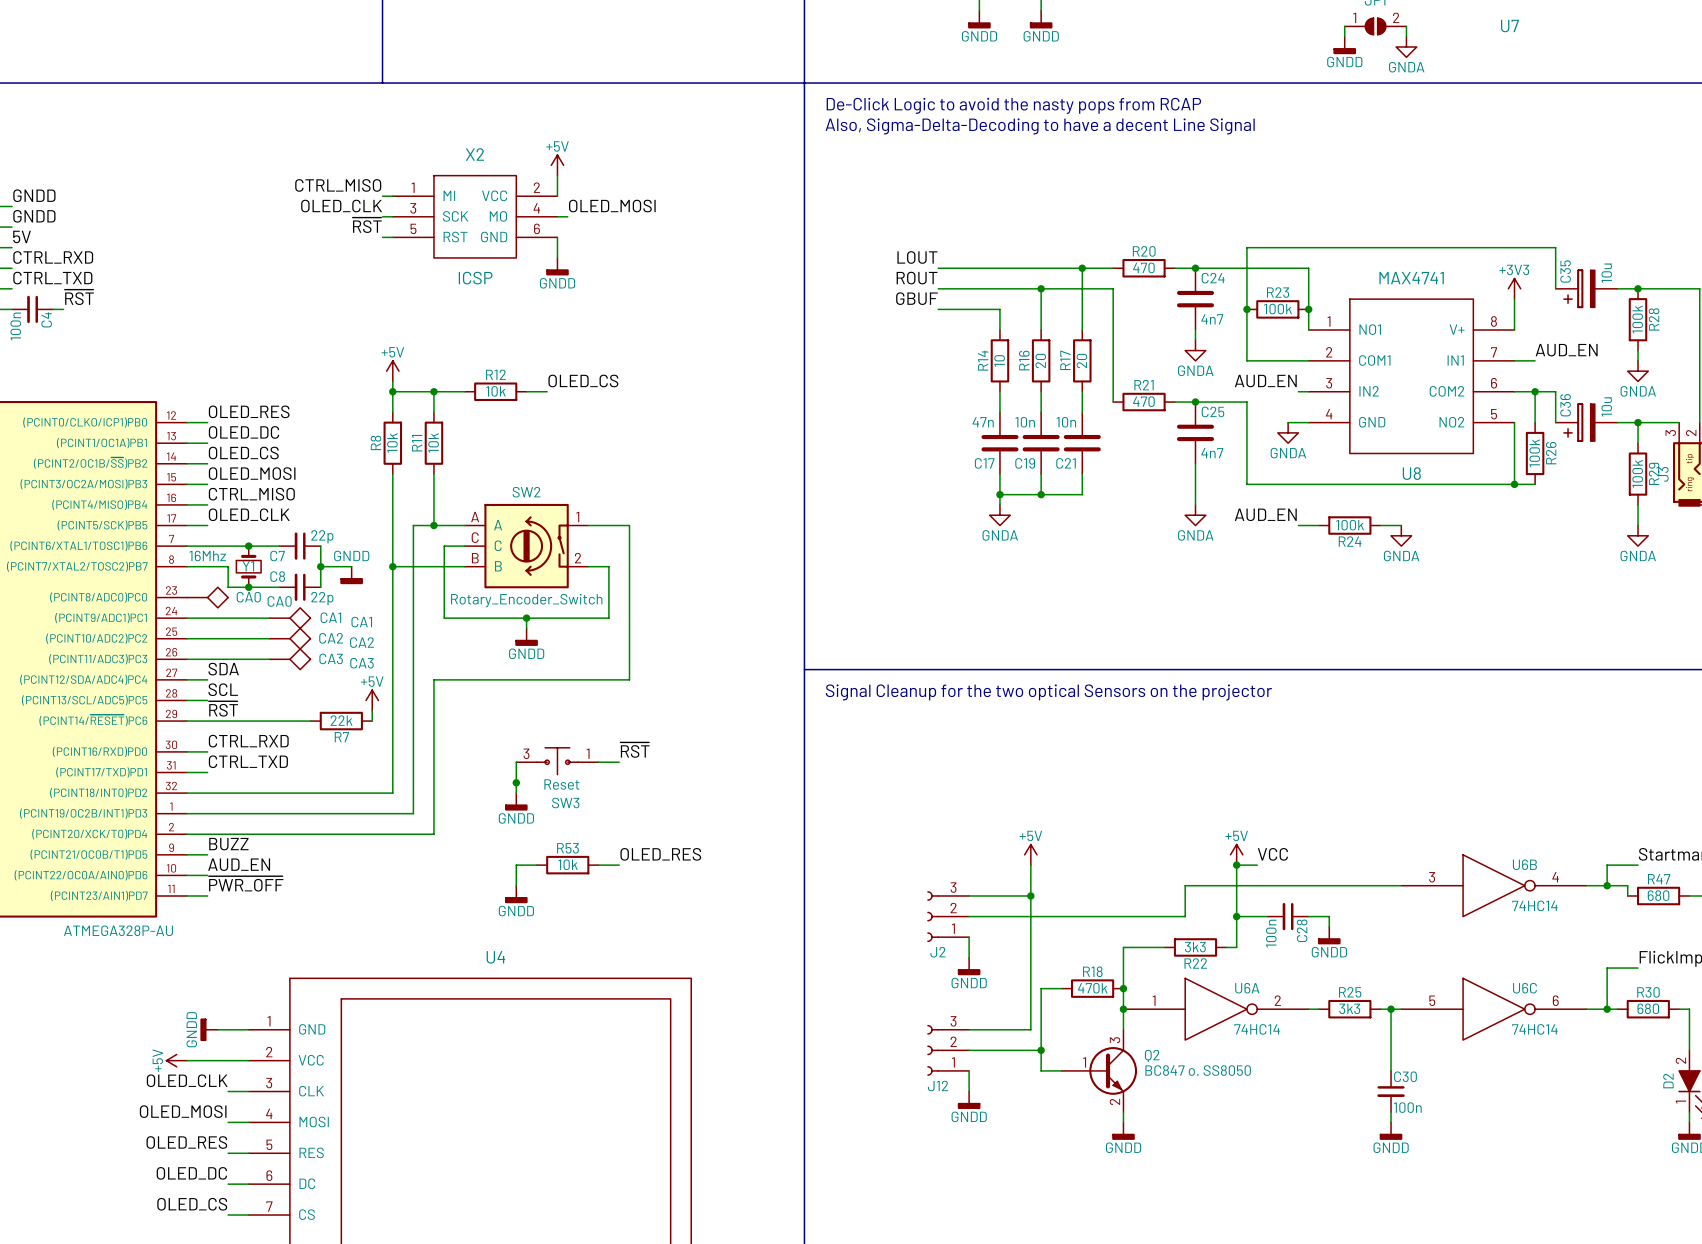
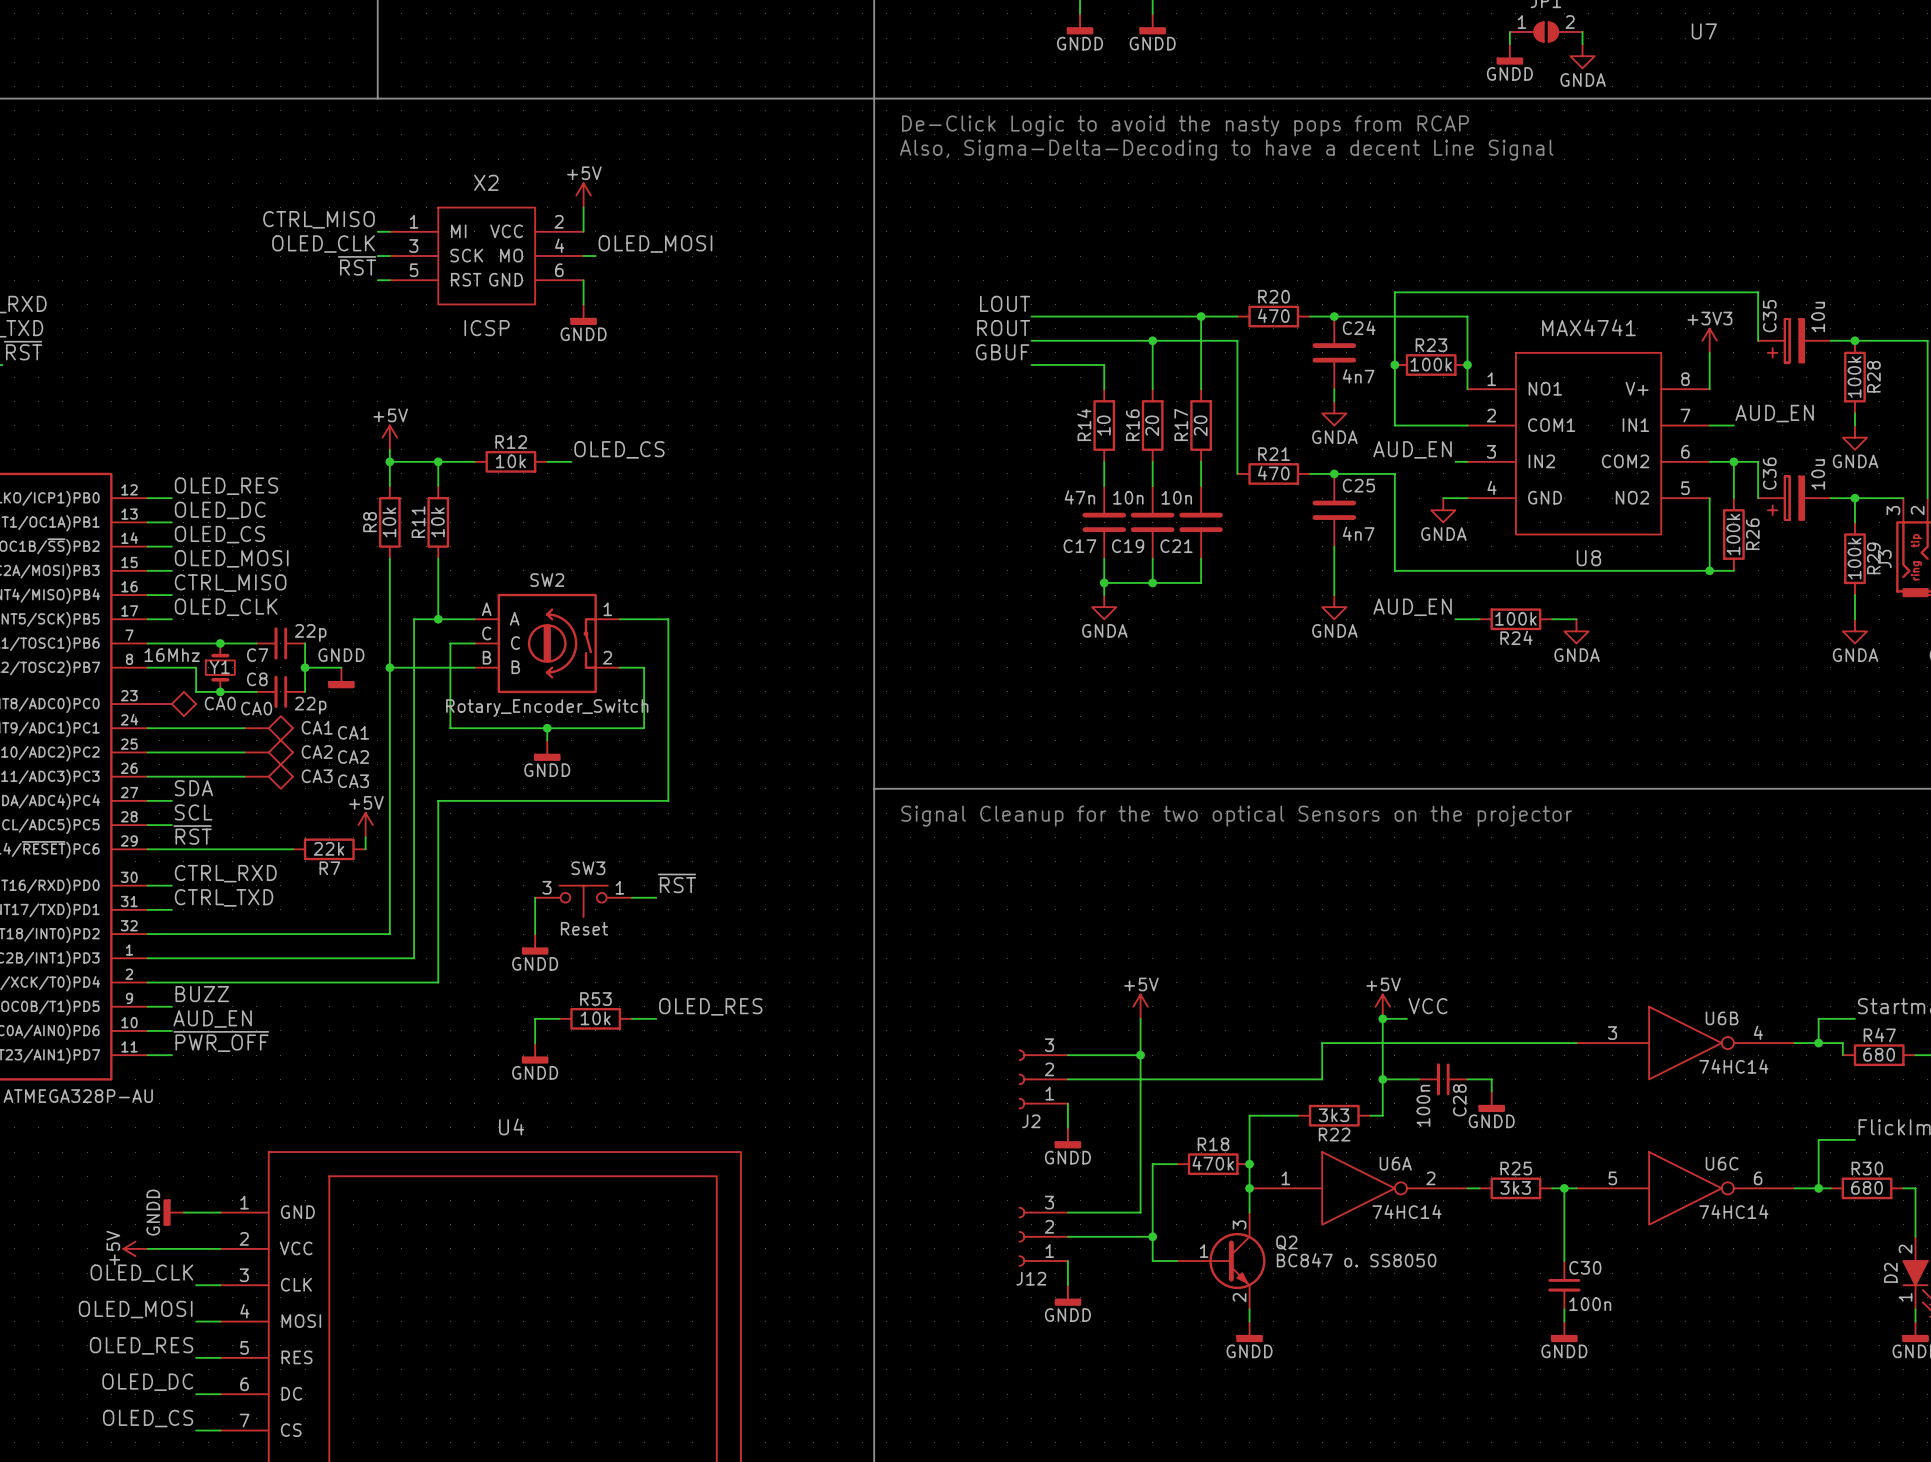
SW3 symbol: [516, 747, 599, 775] -> [535, 885, 633, 918]
junction: (516, 782) -> none
SW3 name position: SW3 (565, 802) -> SW3 (588, 868)

